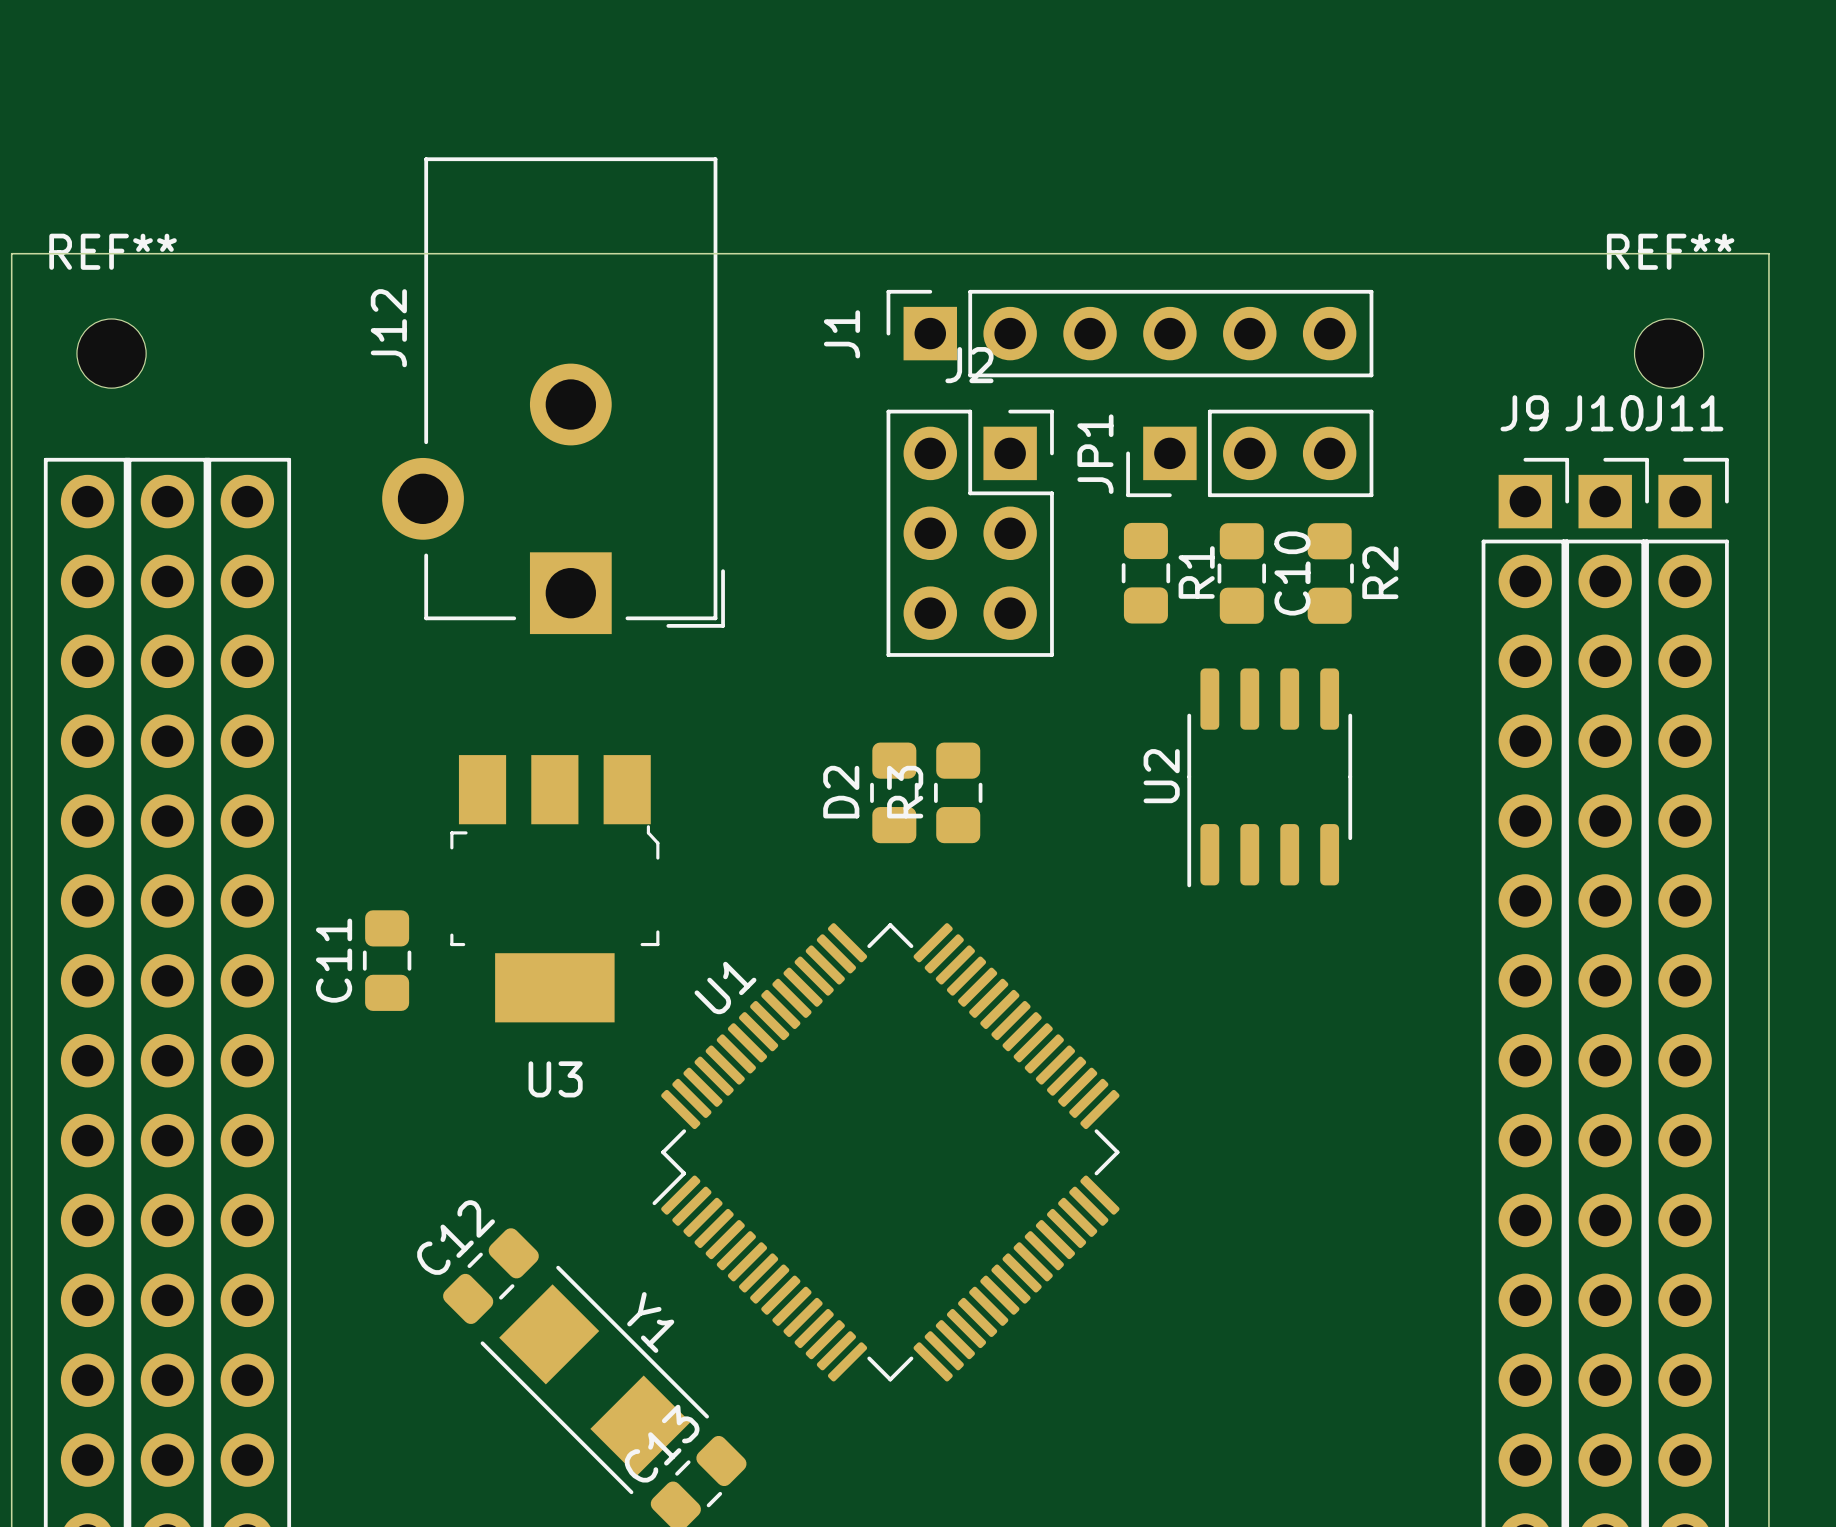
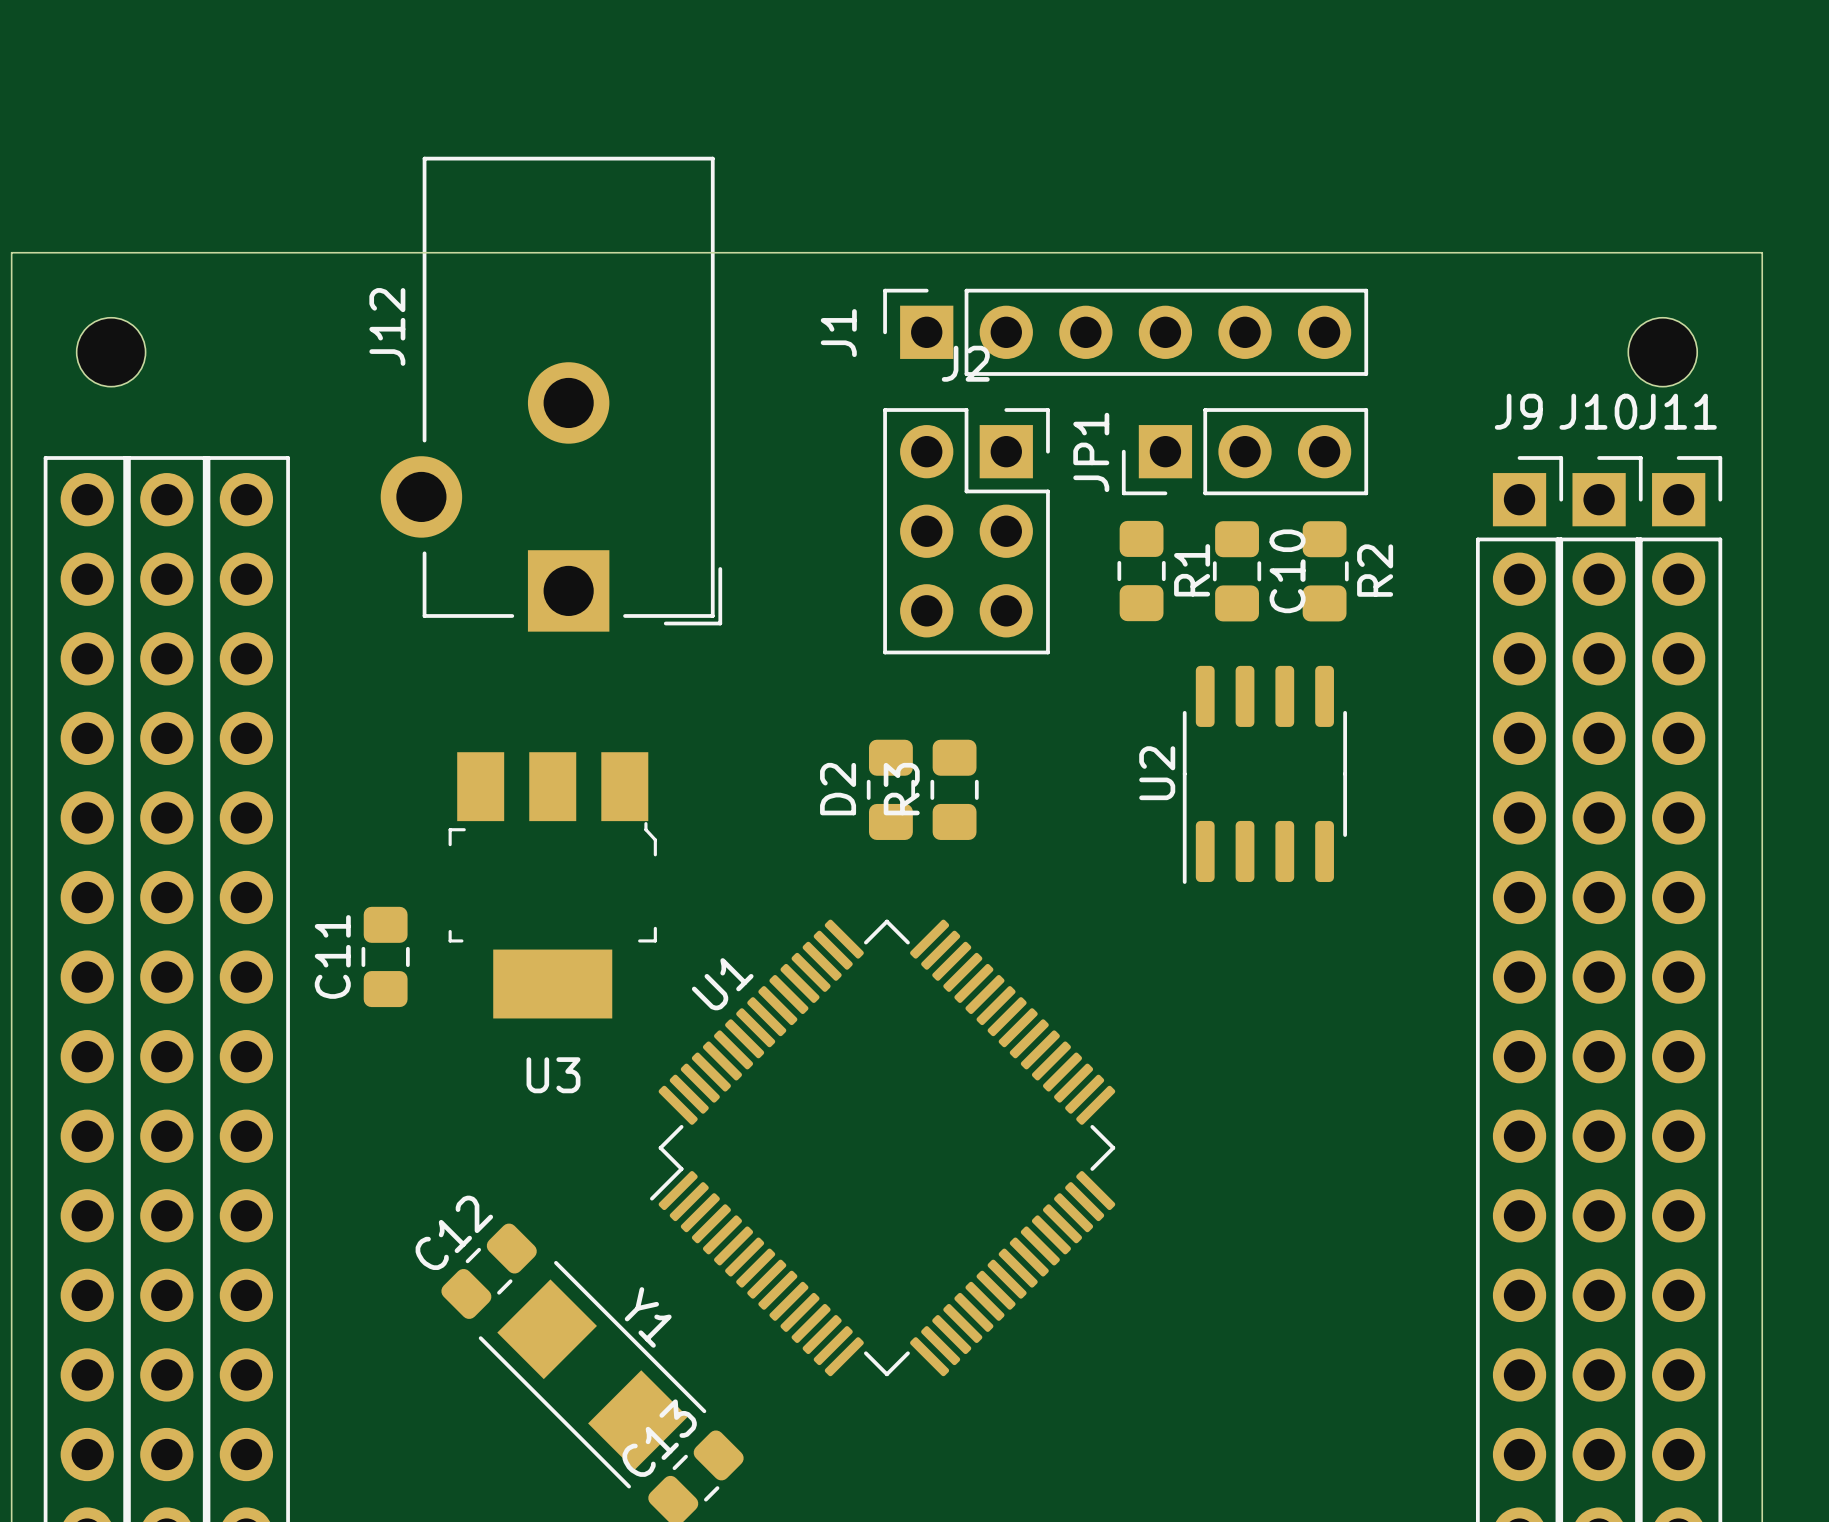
REF** name: REF** (113, 251) -> none
REF** name: REF** (1670, 251) -> none

